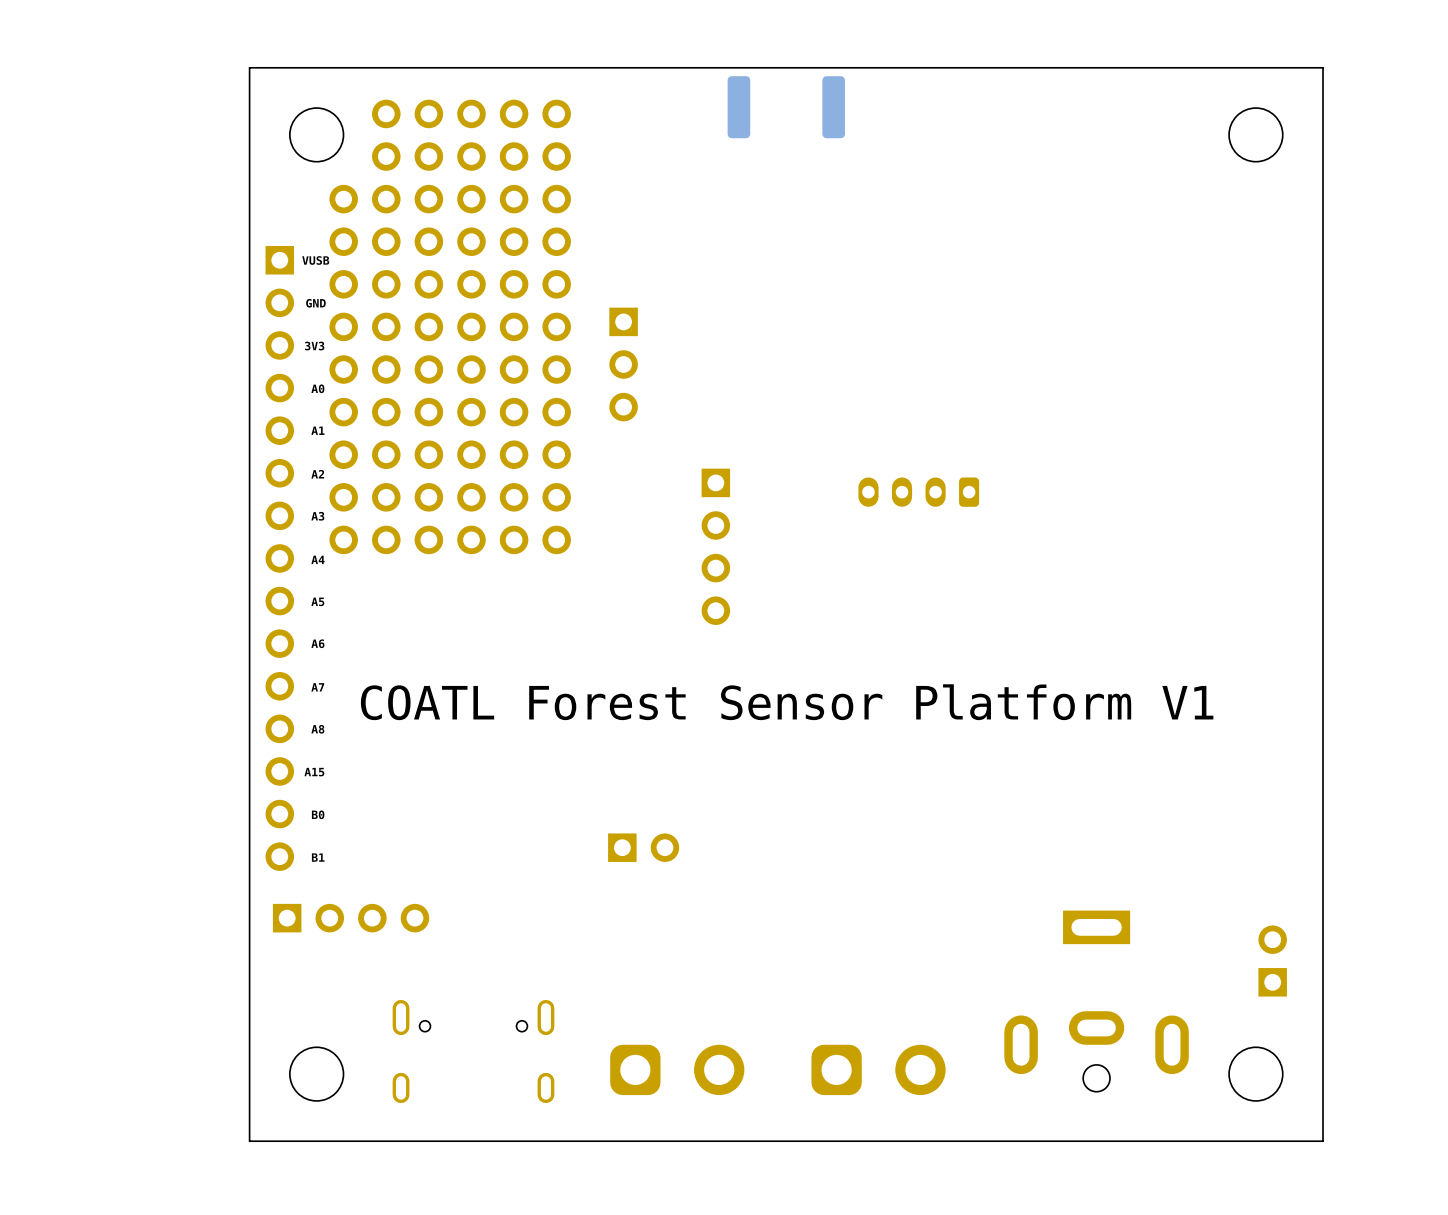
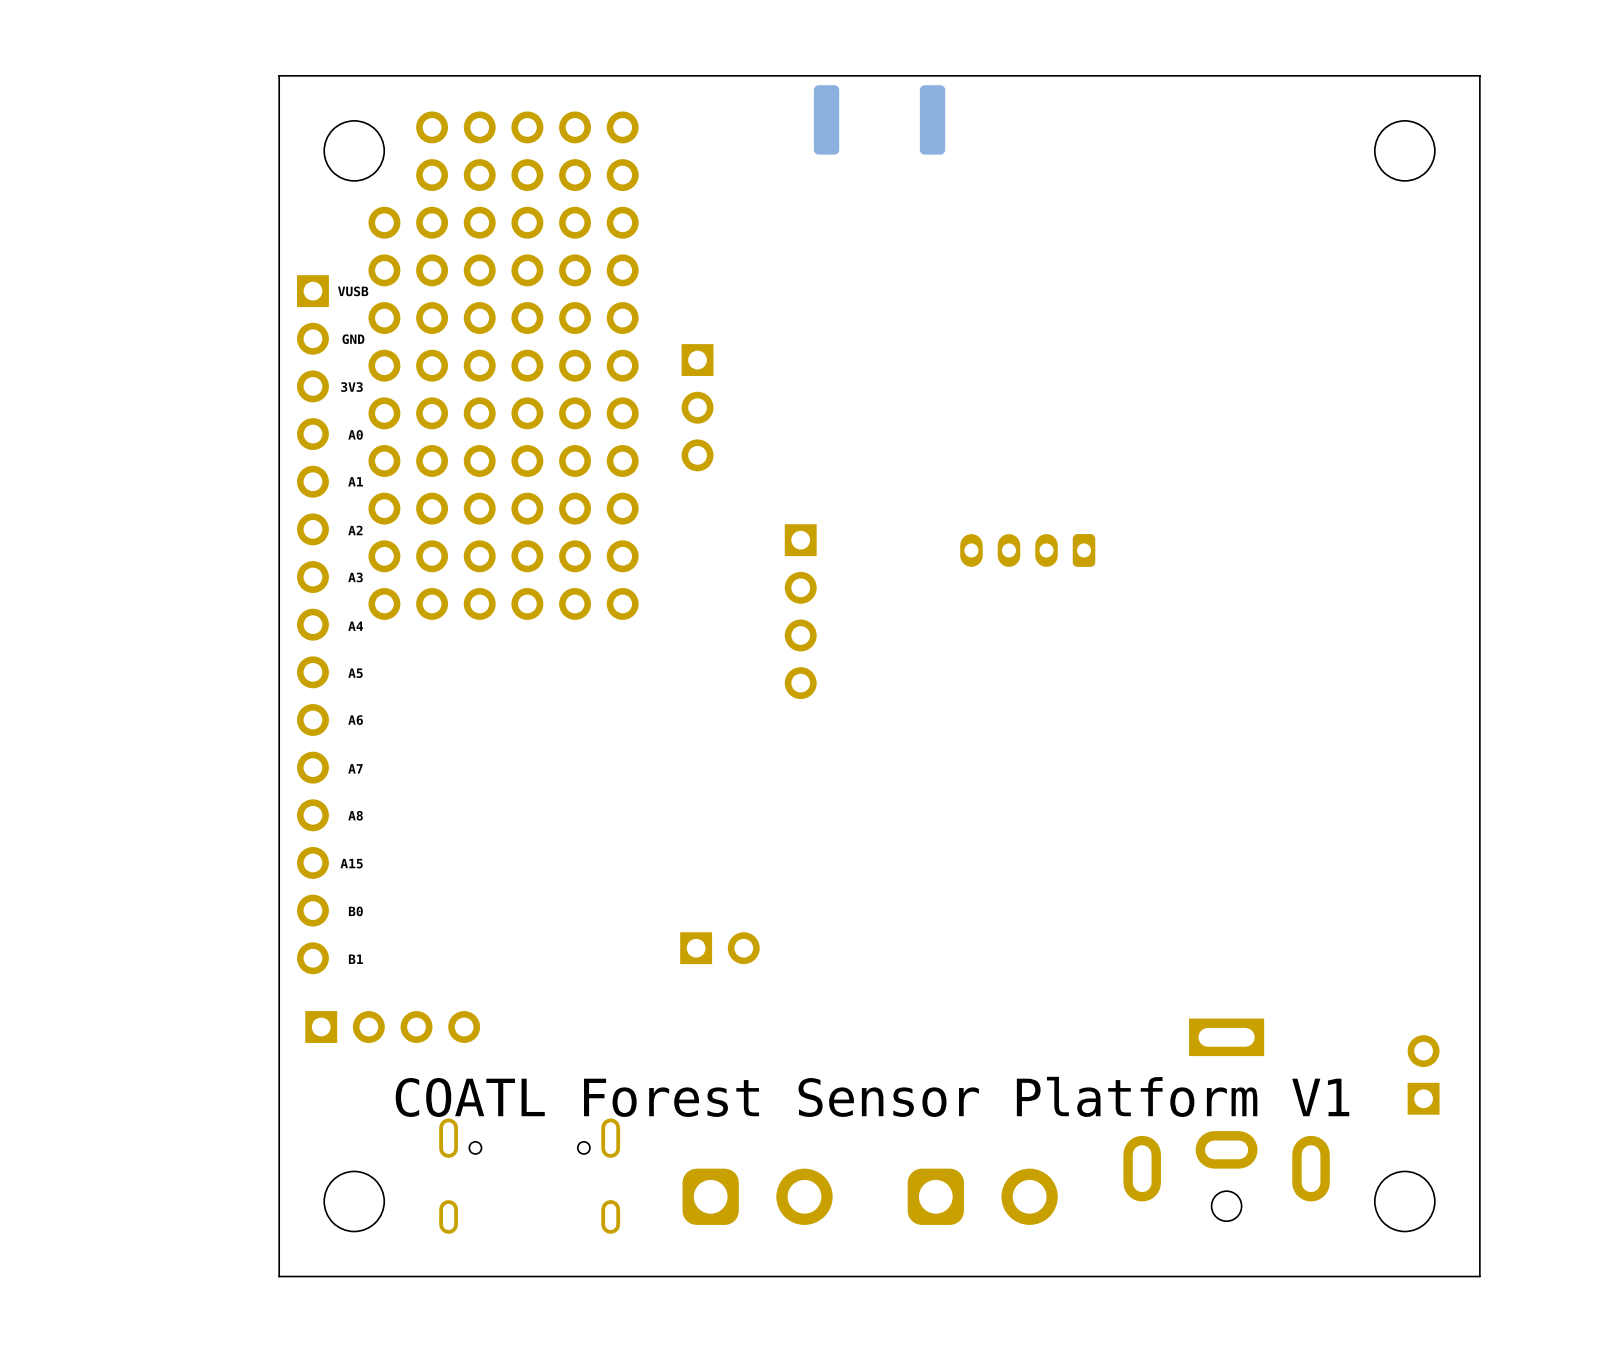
text position: COATL Forest Sensor Platform V1 (787, 702) -> COATL Forest Sensor Platform V1 (872, 1096)

